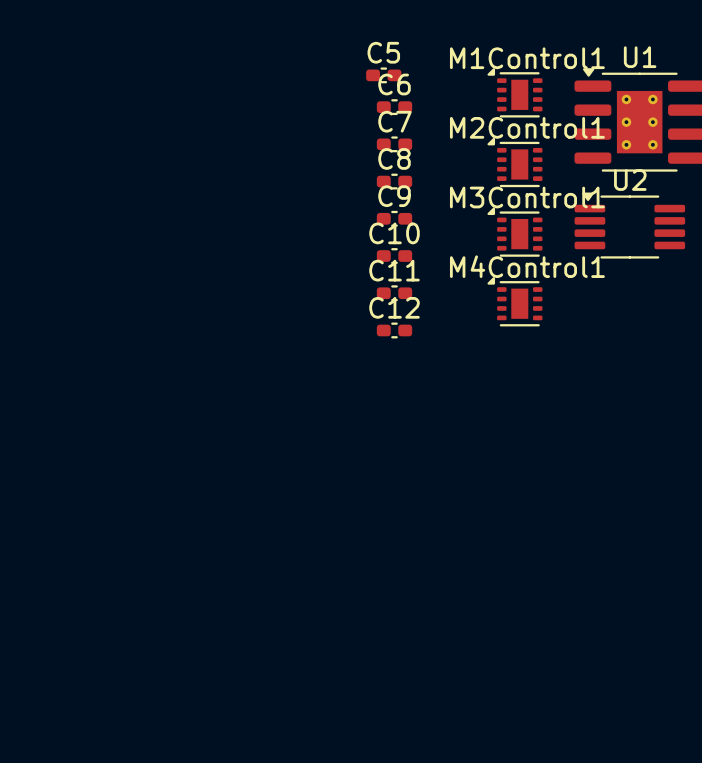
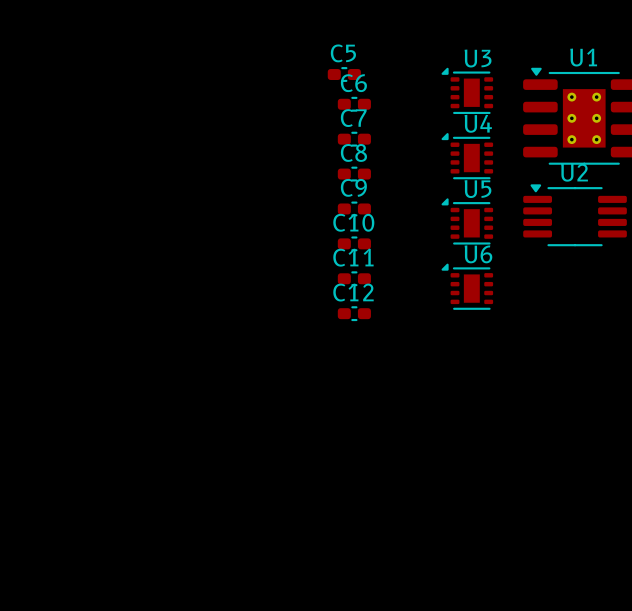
M1Control1 name: M1Control1 (527, 58) -> U3 (478, 58)
M2Control1 name: M2Control1 (527, 127) -> U4 (478, 123)
M3Control1 name: M3Control1 (527, 197) -> U5 (477, 189)
M4Control1 name: M4Control1 (527, 266) -> U6 (478, 254)

